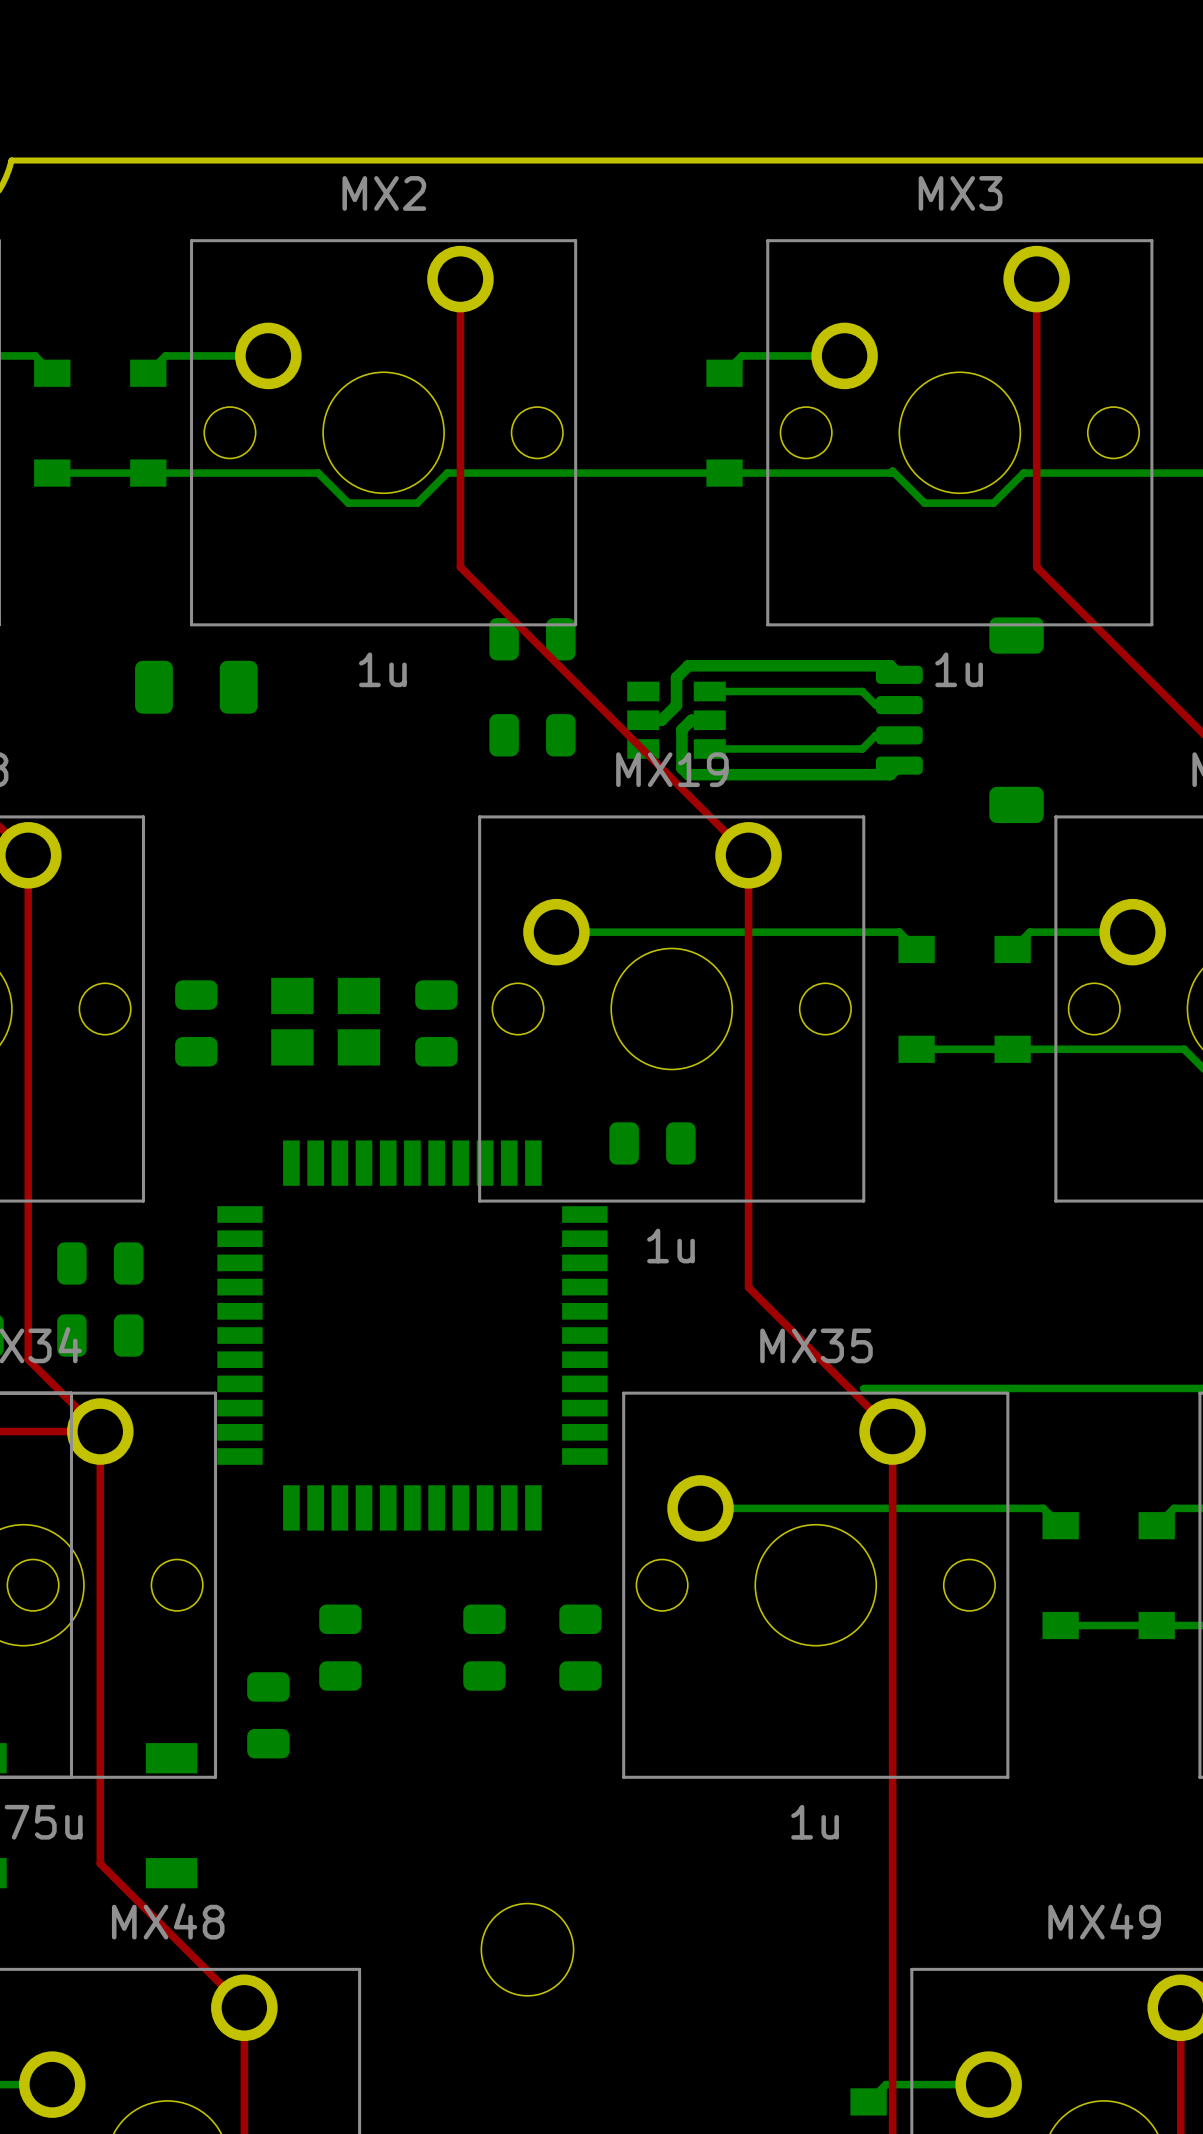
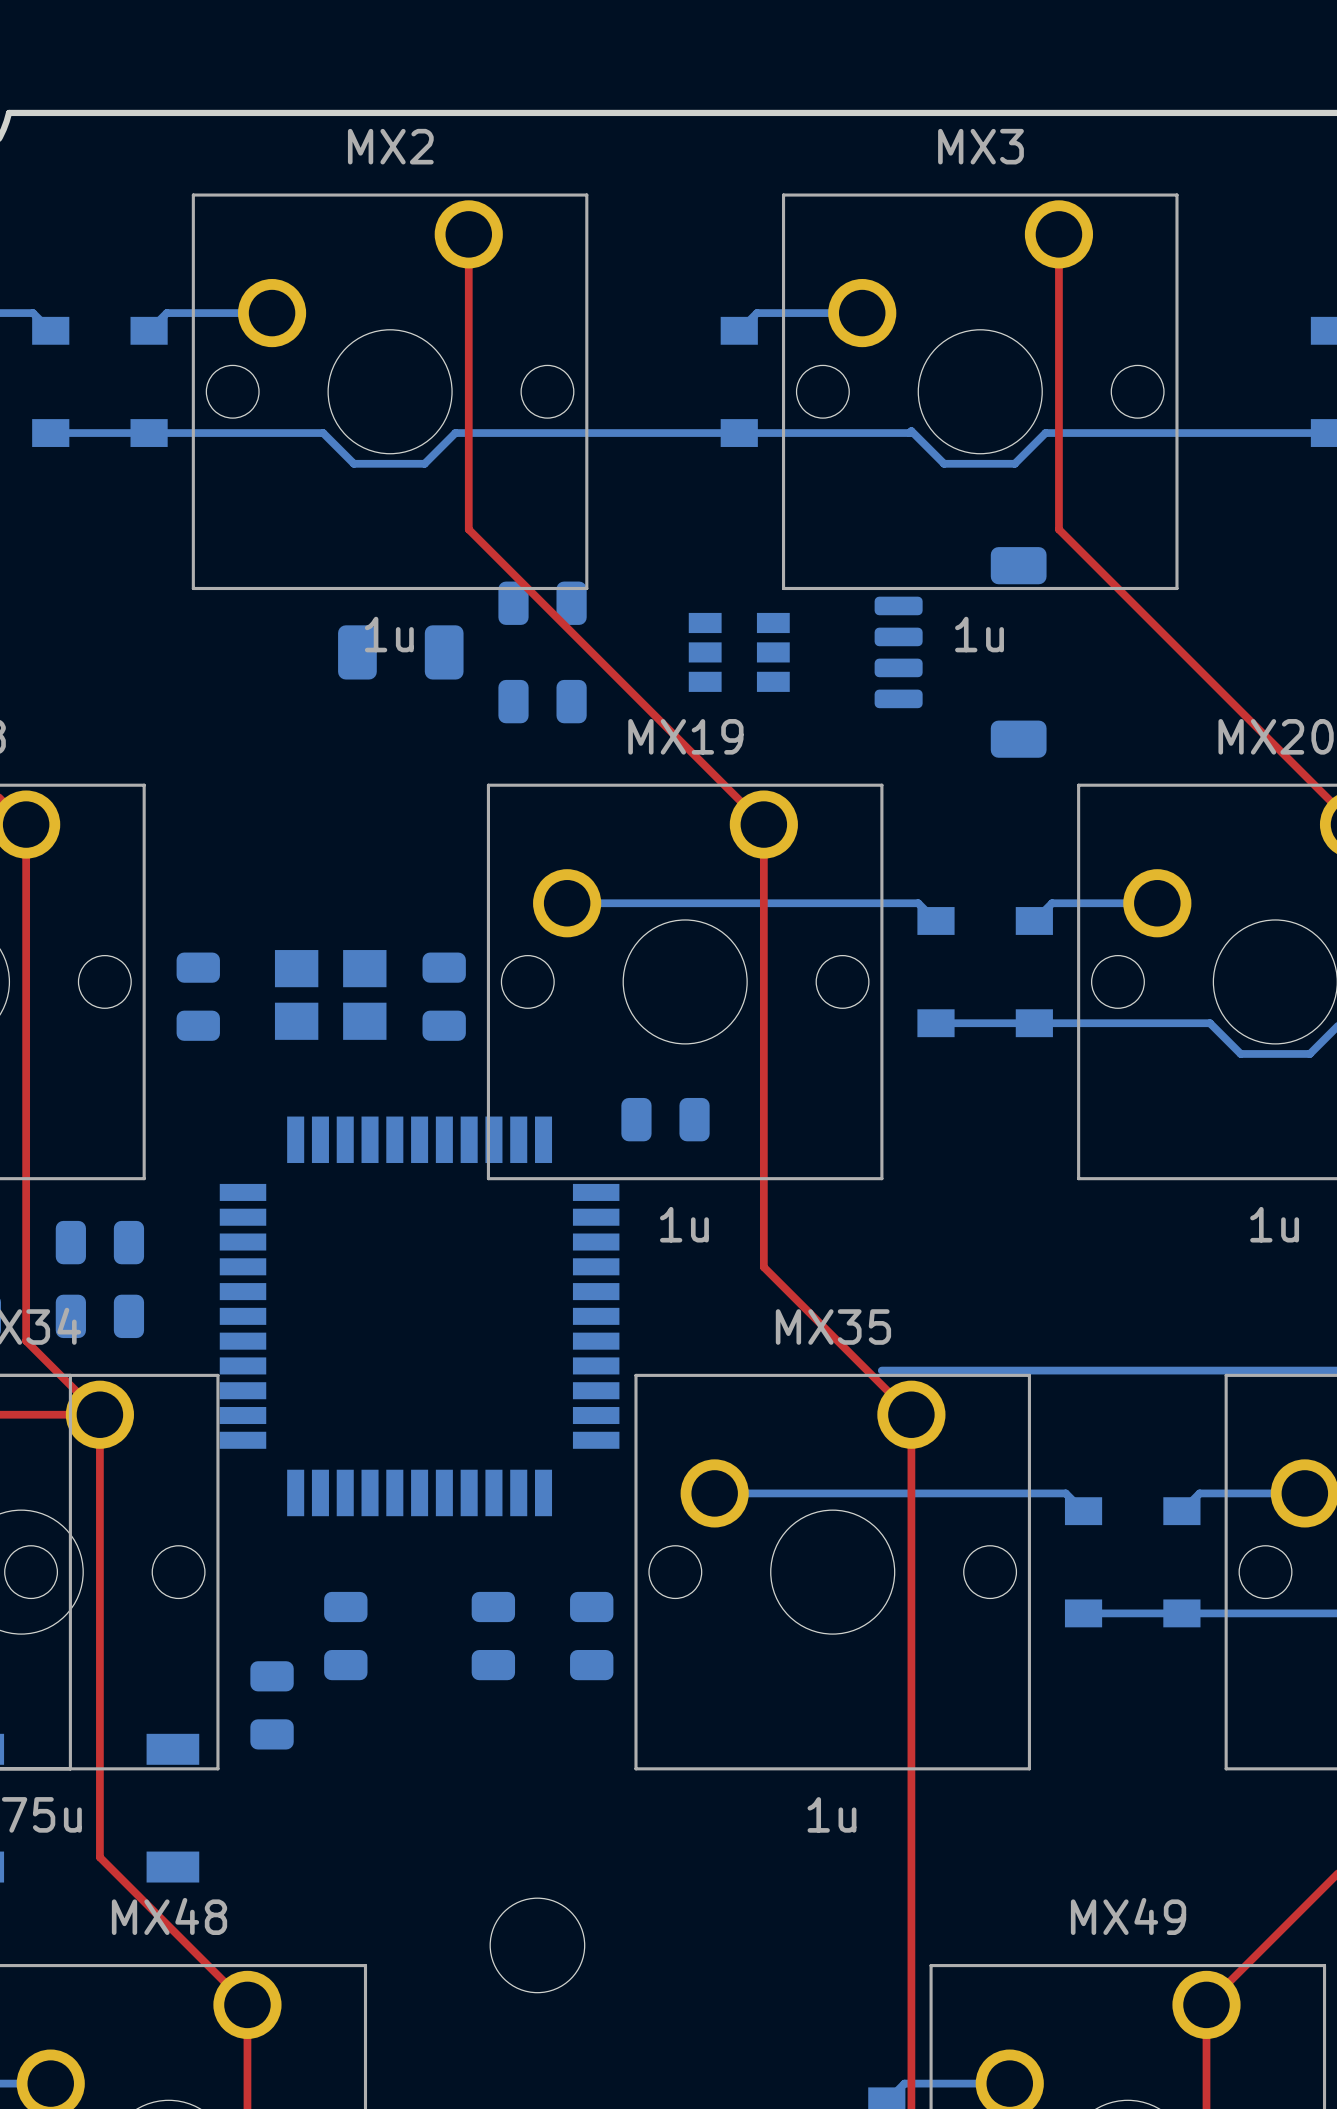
bottom track: (899, 674) (890, 665) (688, 665) (676, 677) (676, 705) (661, 720) (643, 720) -> none
part position: (196, 687) -> (400, 652)
bottom track: (709, 691) (862, 691) (875, 705) (899, 705) -> none
part position: (676, 720) -> (739, 652)
bottom track: (709, 720) (691, 720) (681, 729) (681, 768) (688, 774) (890, 774) (899, 765) -> none
part position: (959, 720) -> (960, 652)
bottom track: (899, 735) (875, 735) (862, 748) (709, 748) -> none

